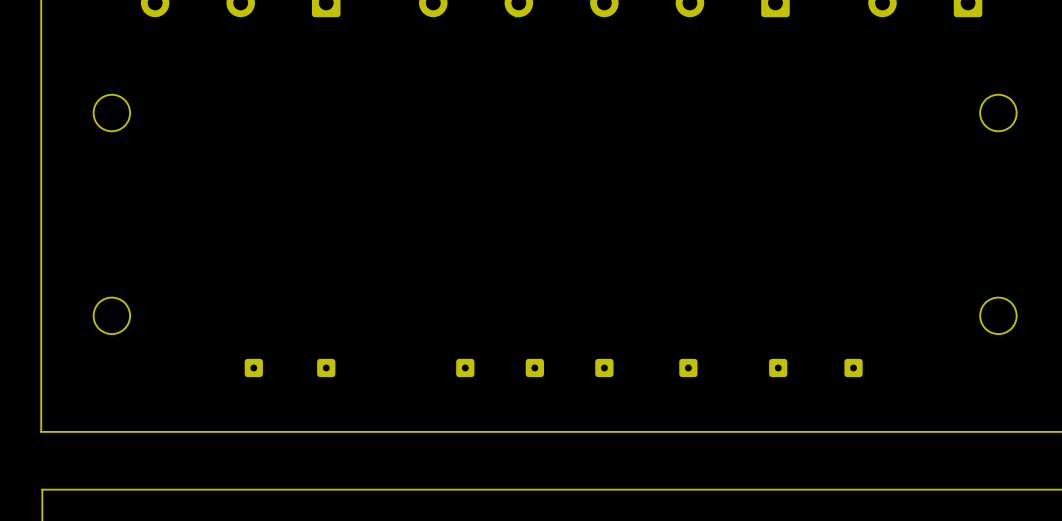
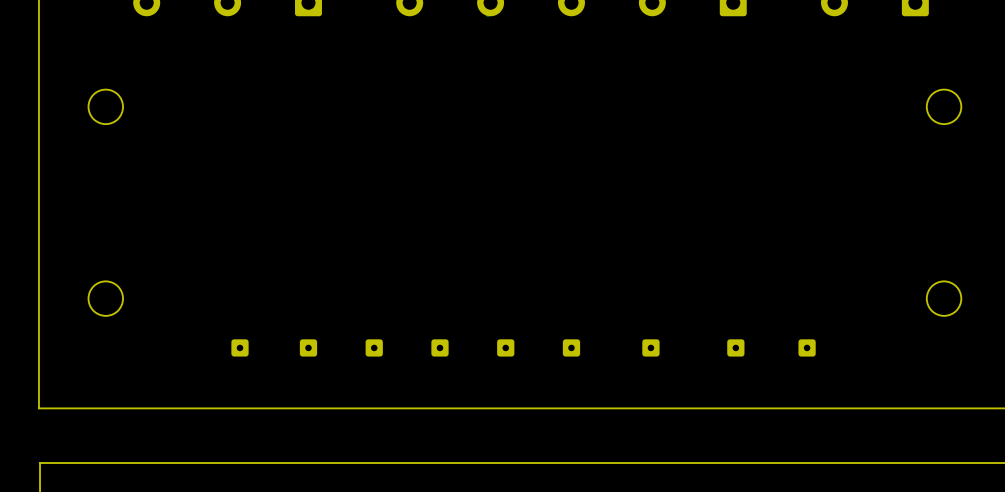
part: none -> (374, 347)

